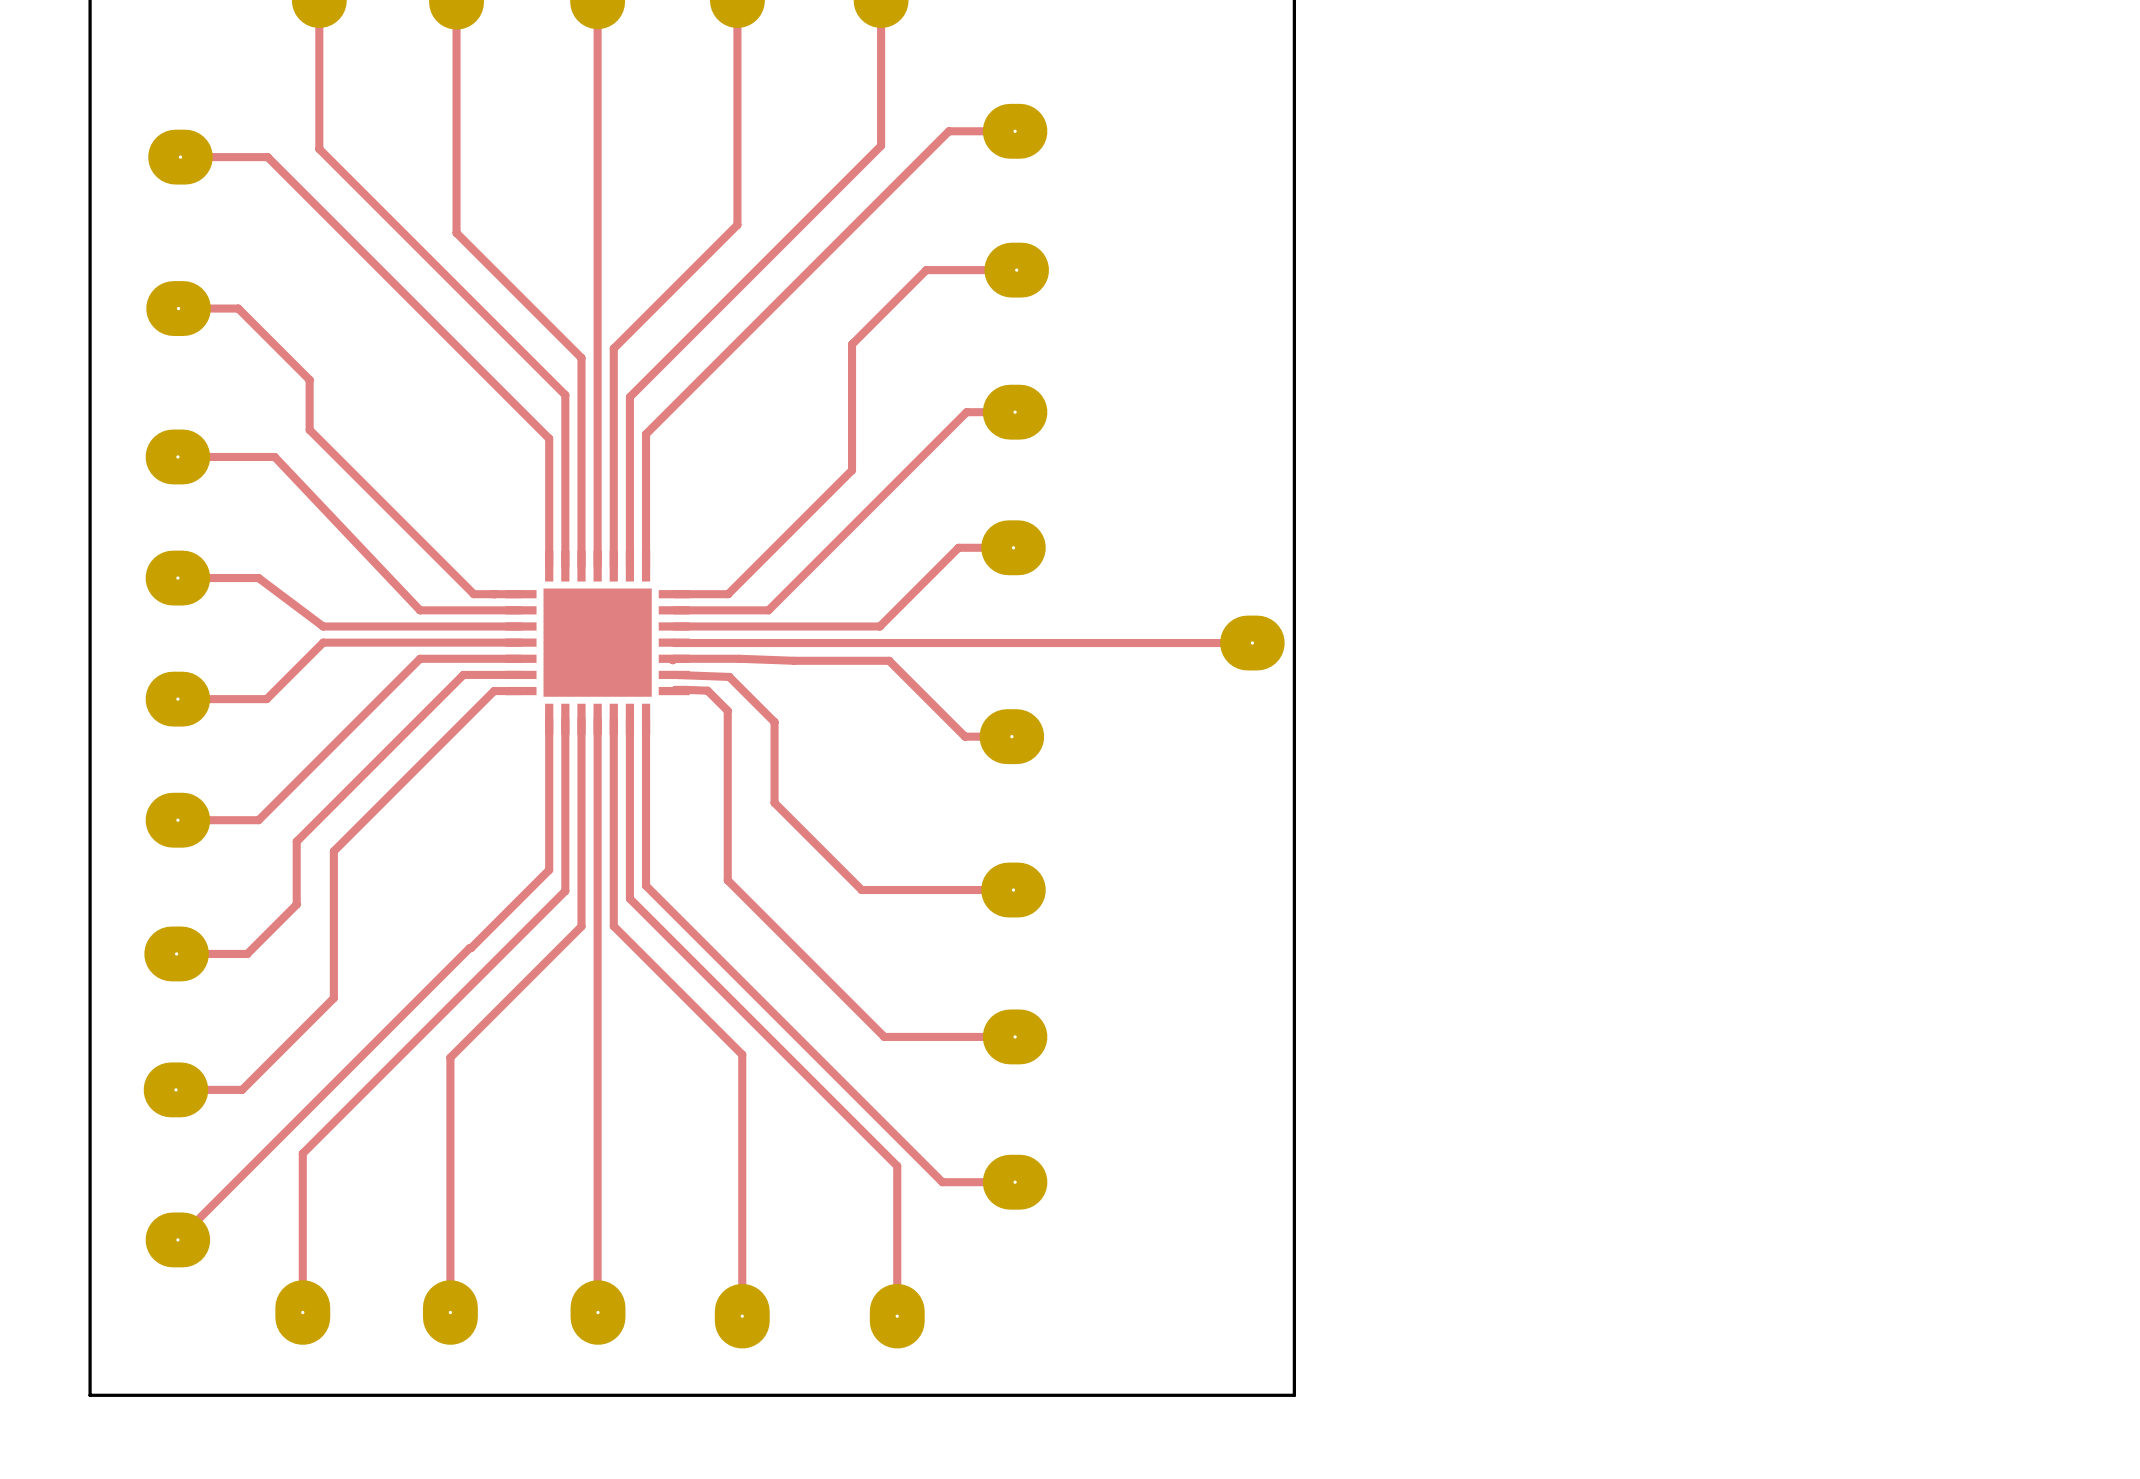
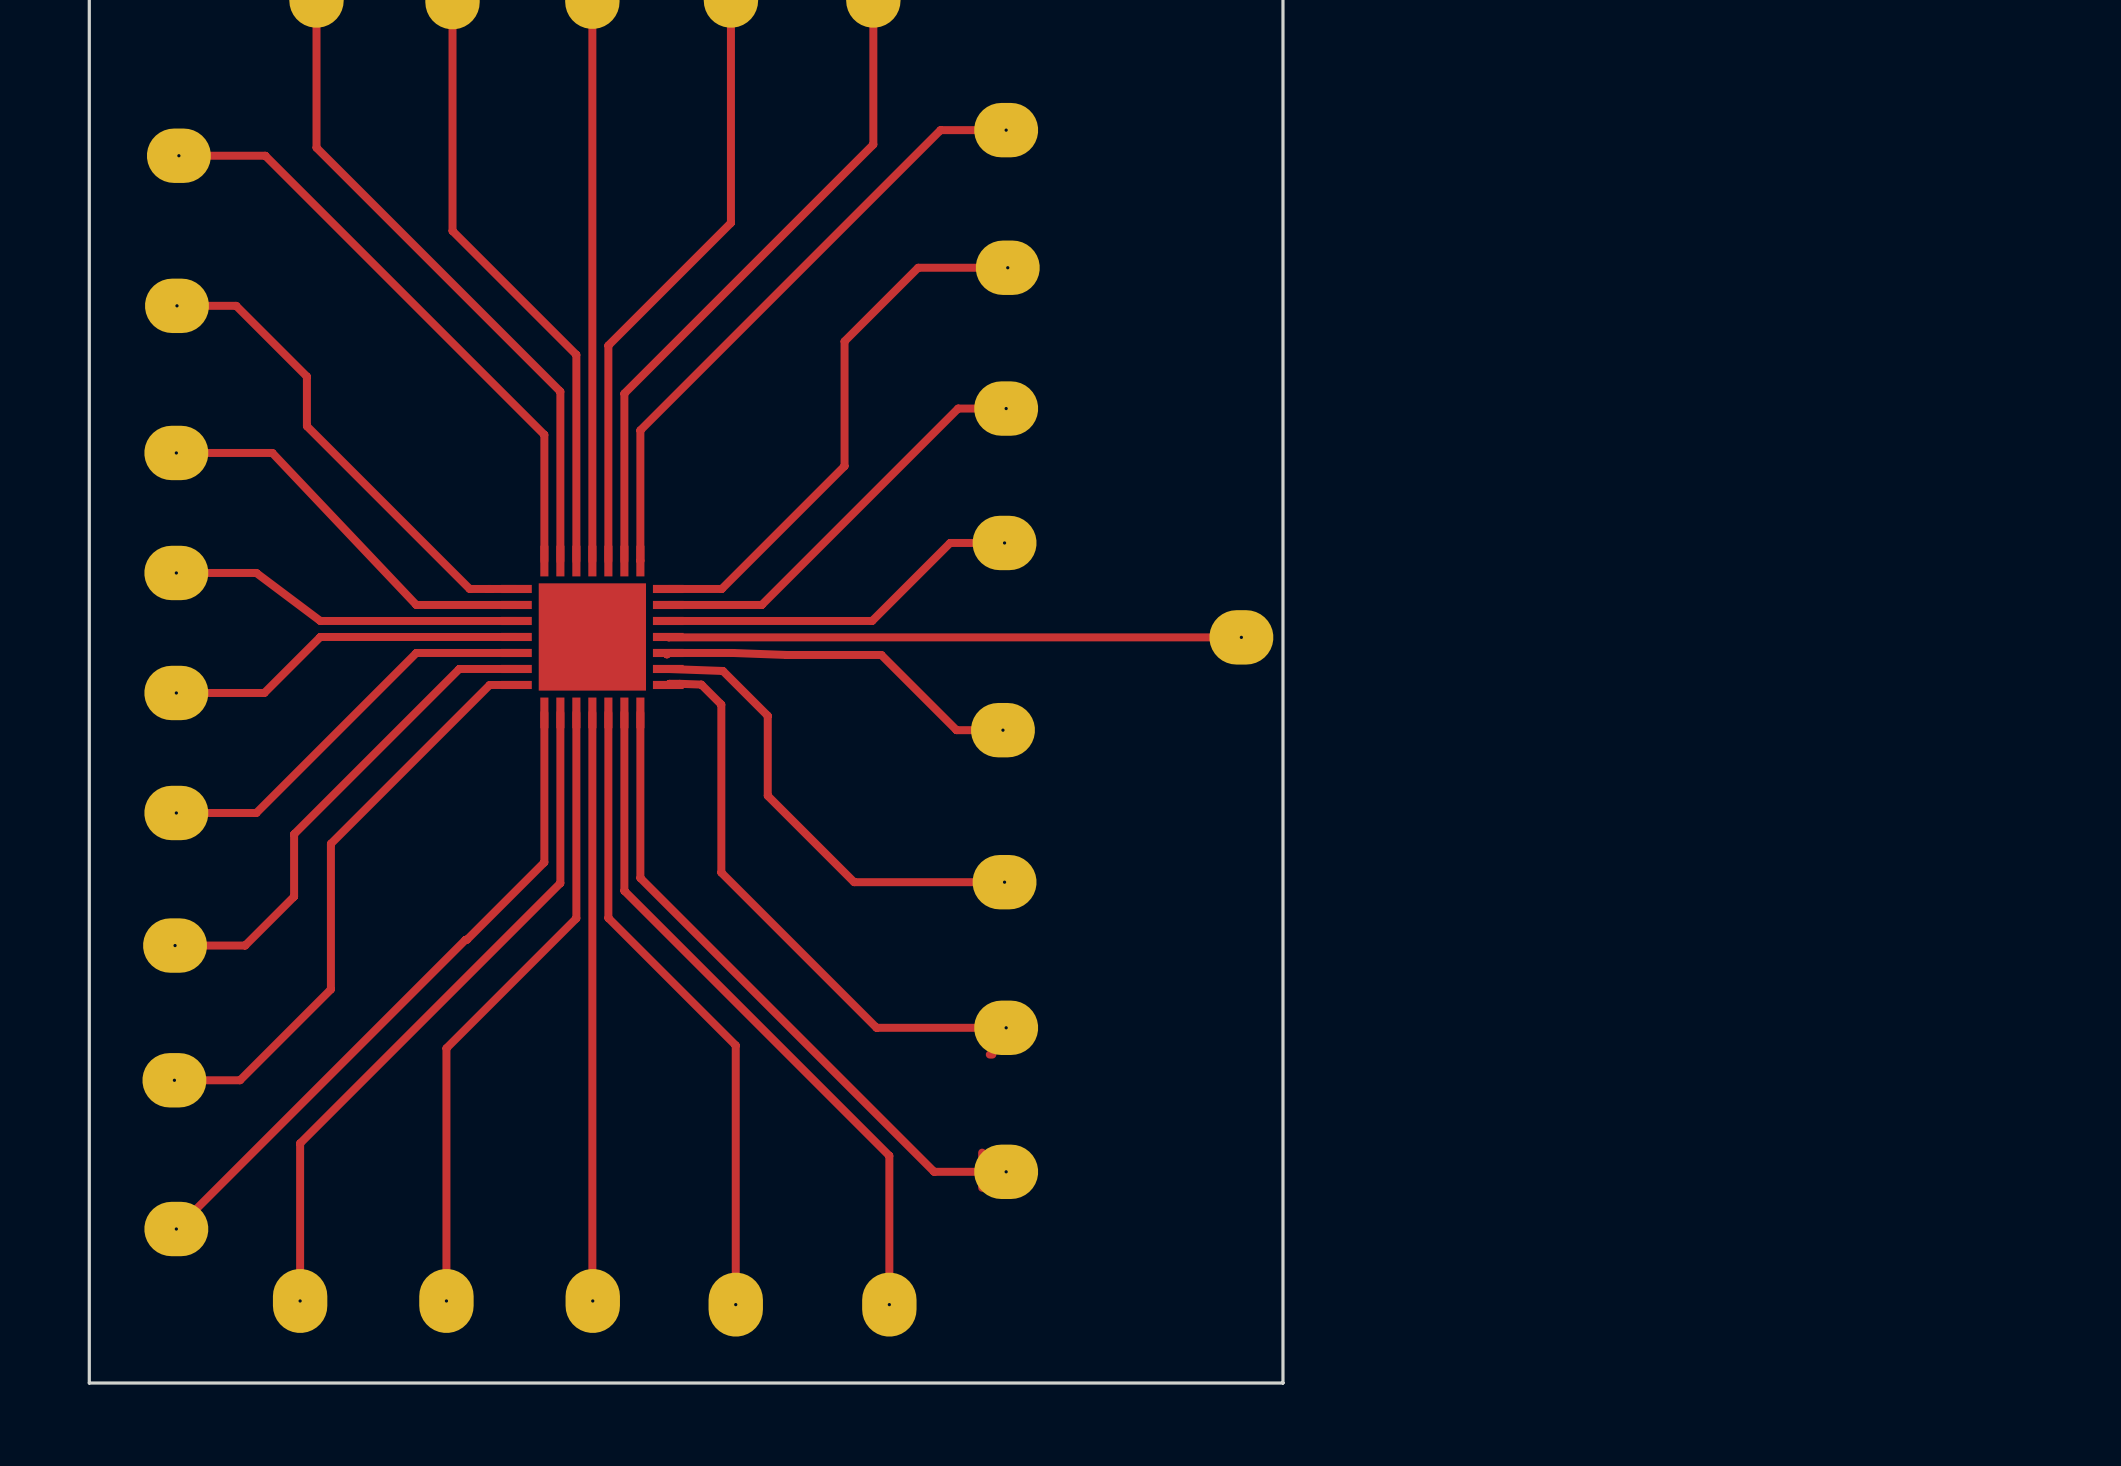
top track: none -> (992, 1054) (989, 1054)
top track: none -> (982, 1152) (982, 1187)

